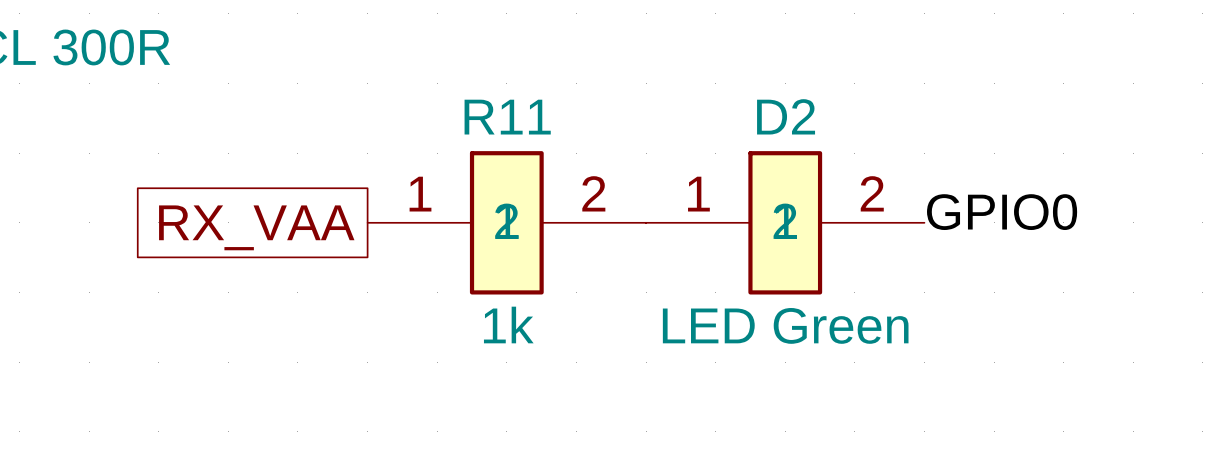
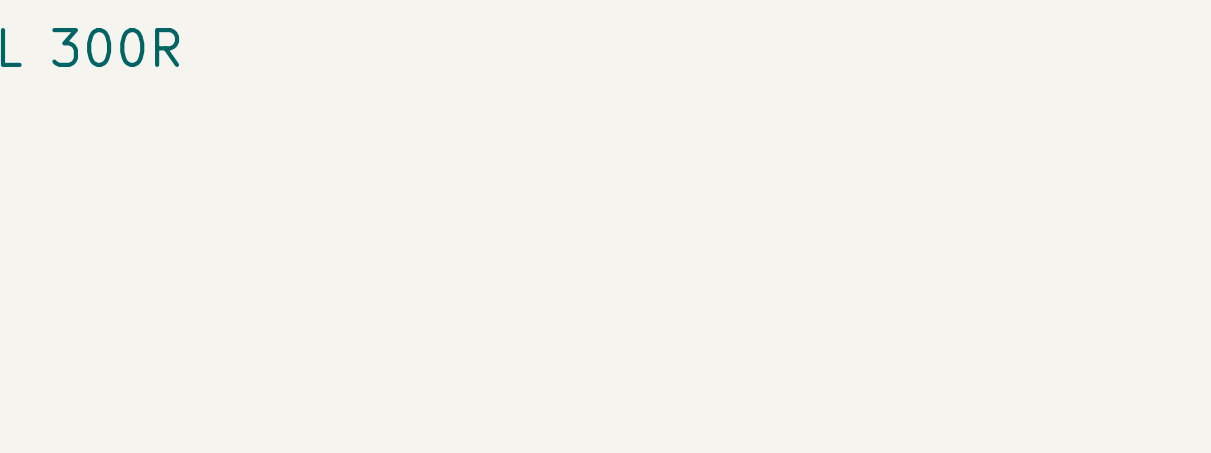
label: GPIO0 (1002, 212) -> none
R11: 1k (506, 222) -> none
D2: LED Green (785, 222) -> none
global label: RX_VAA (256, 227) -> none

